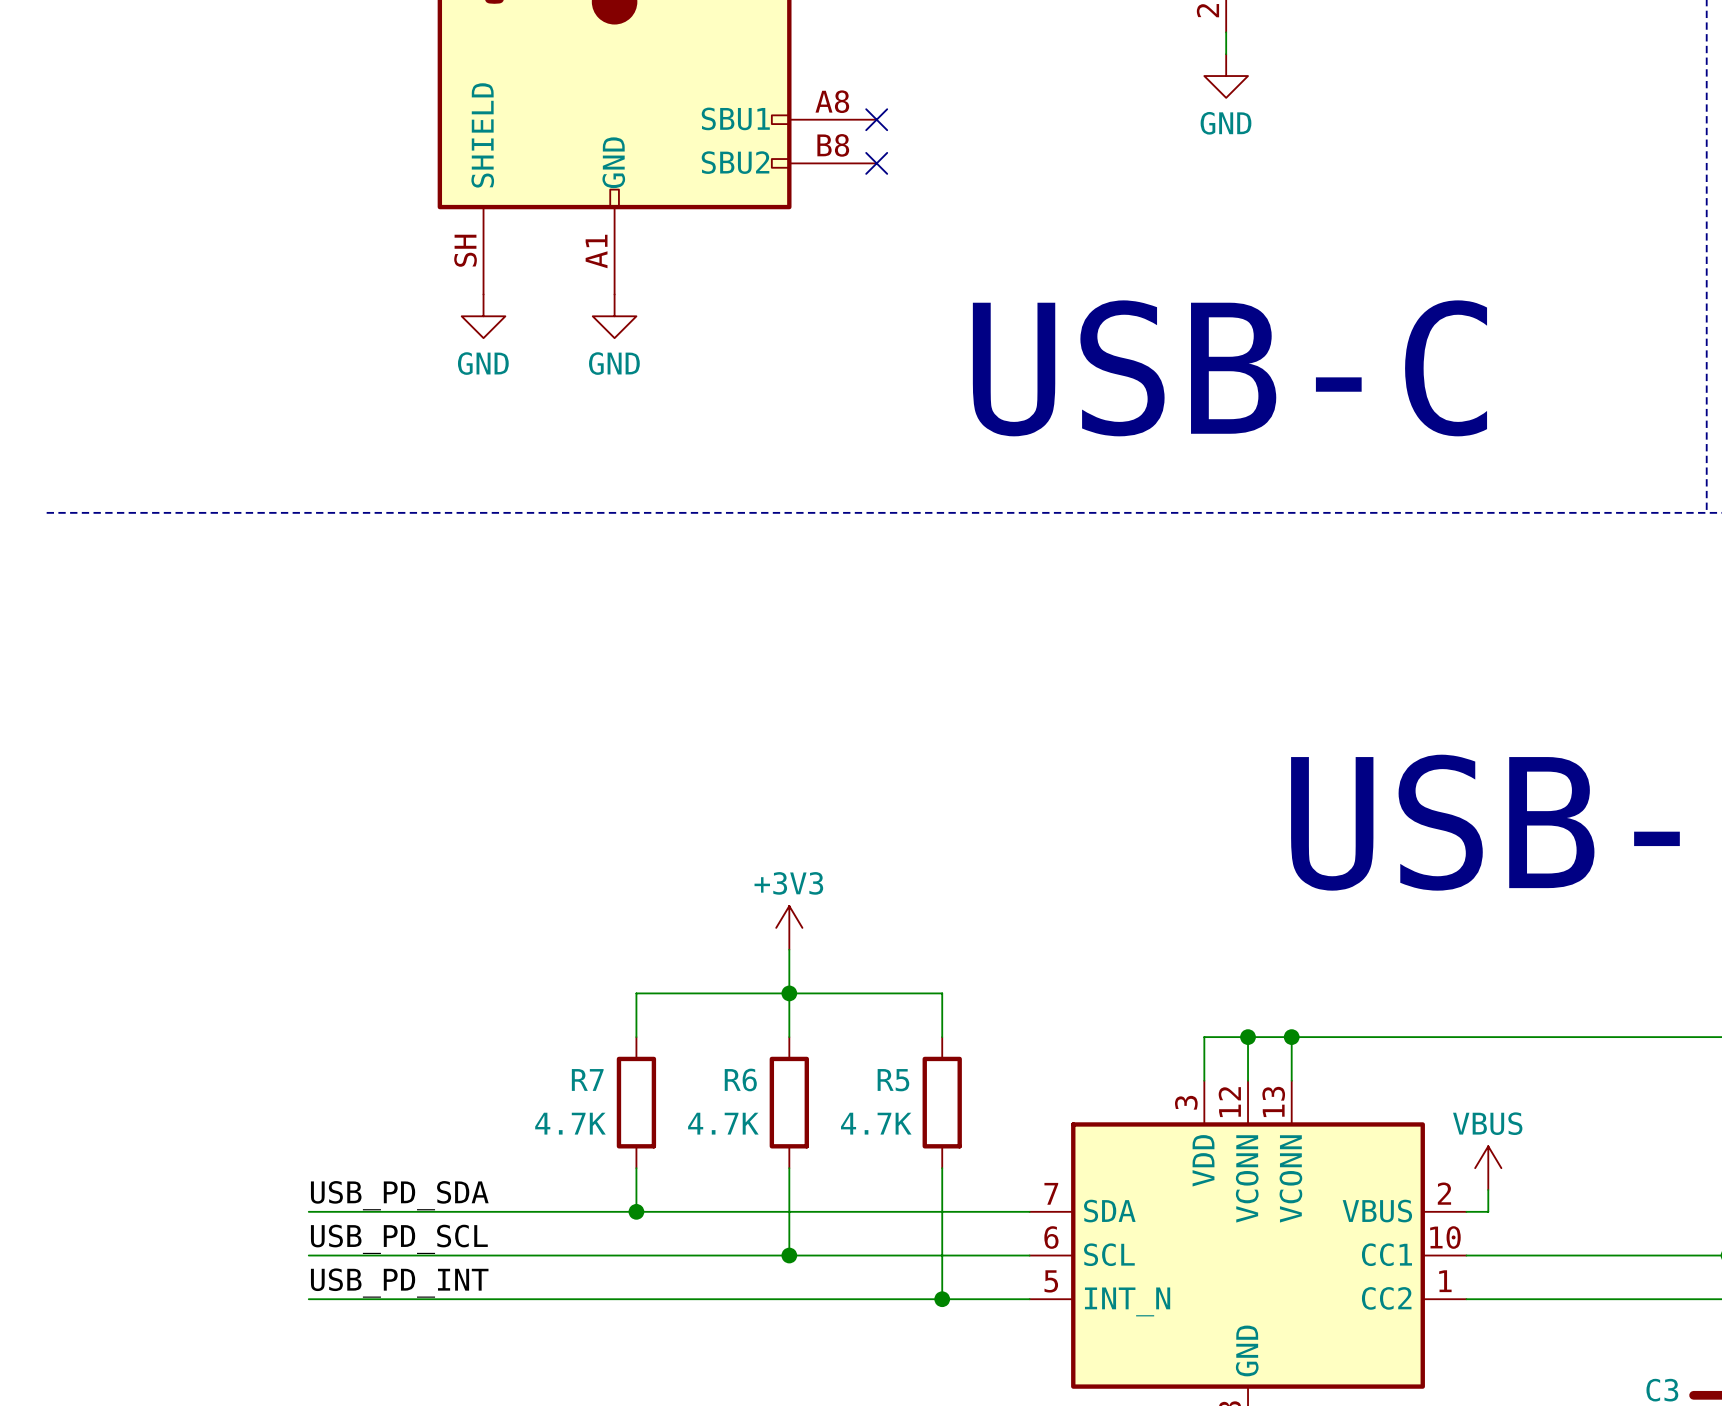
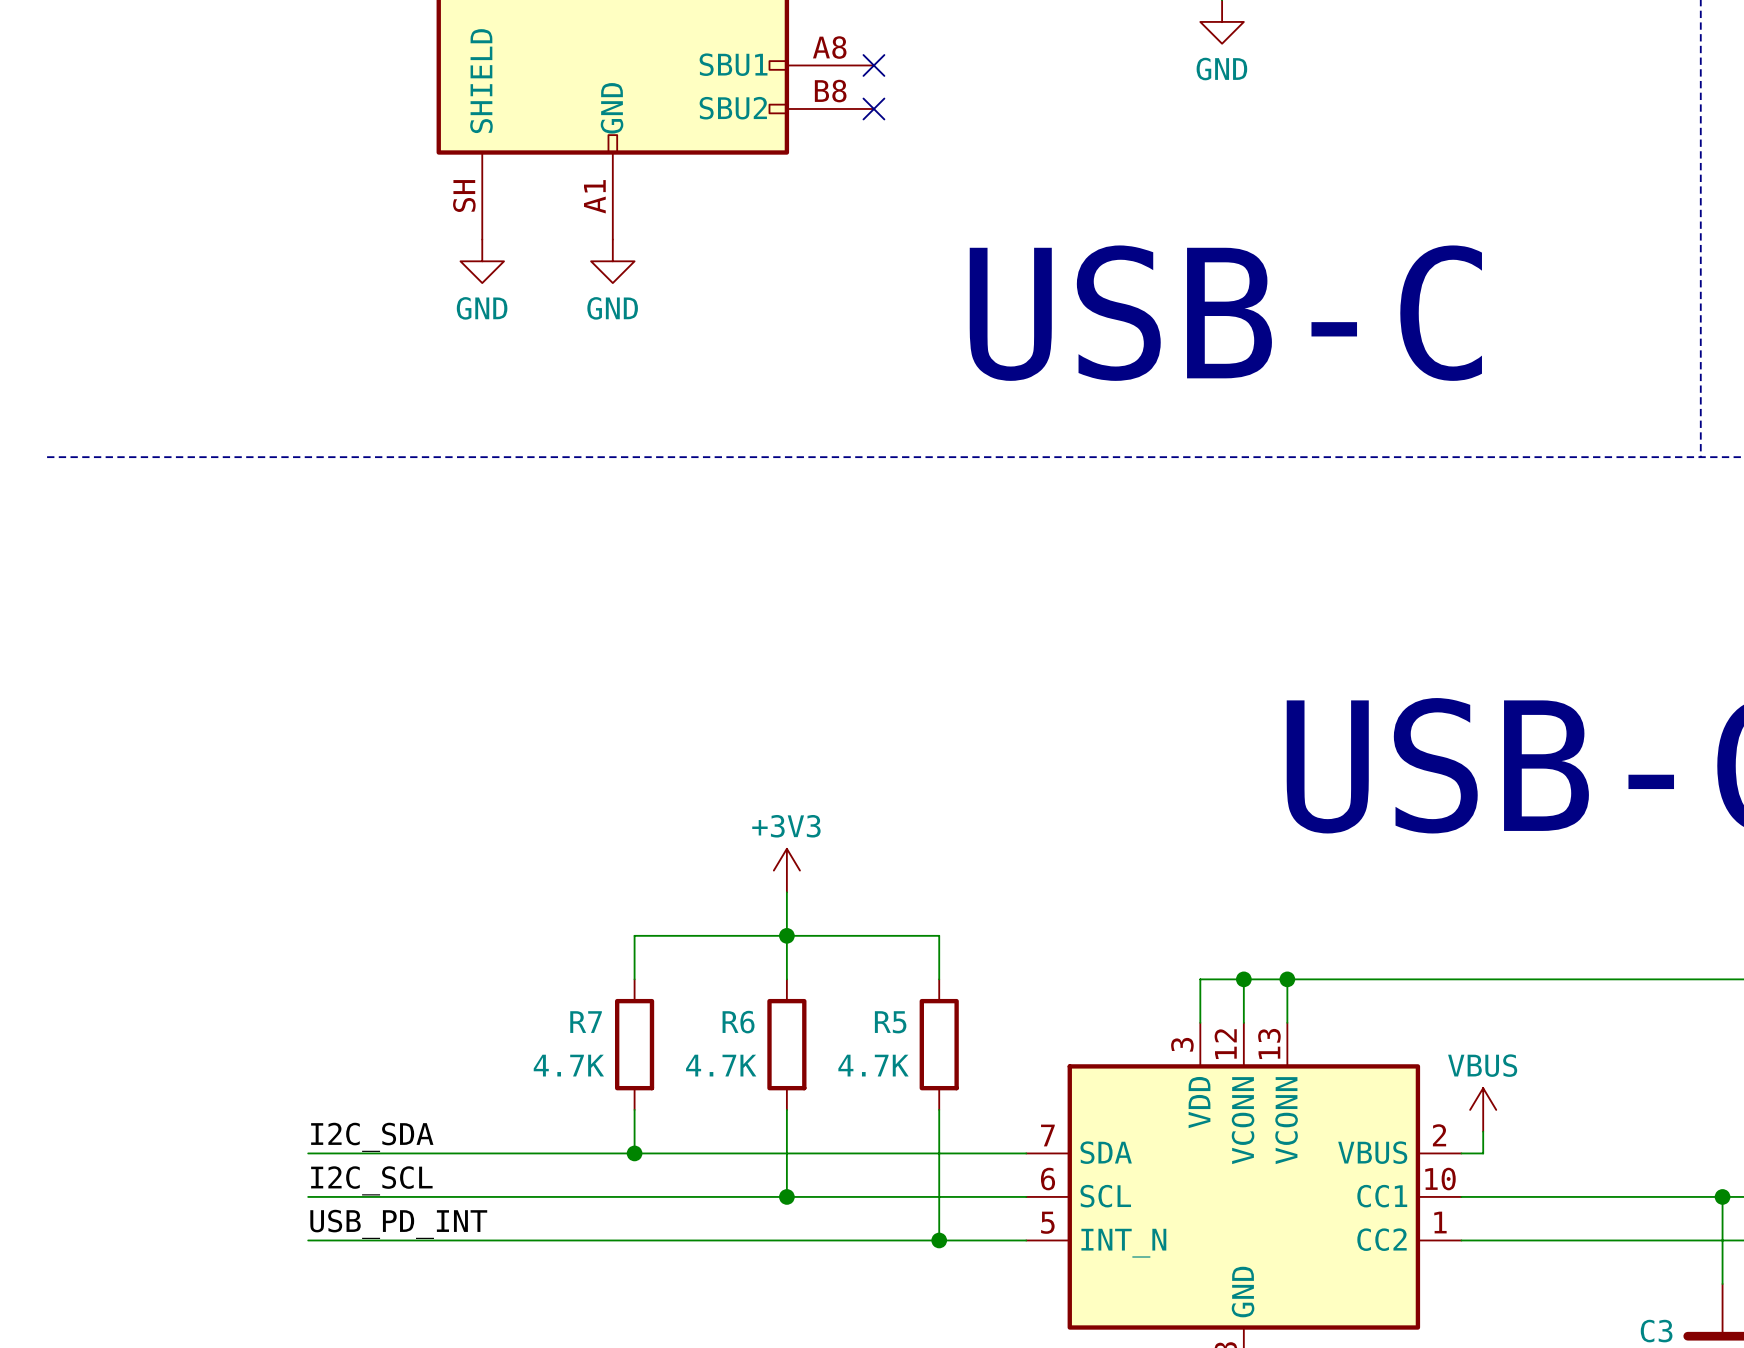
label: USB_PD_SDA (399, 1195) -> I2C_SDA (372, 1137)
label: USB_PD_SCL (399, 1239) -> I2C_SCL (371, 1180)

